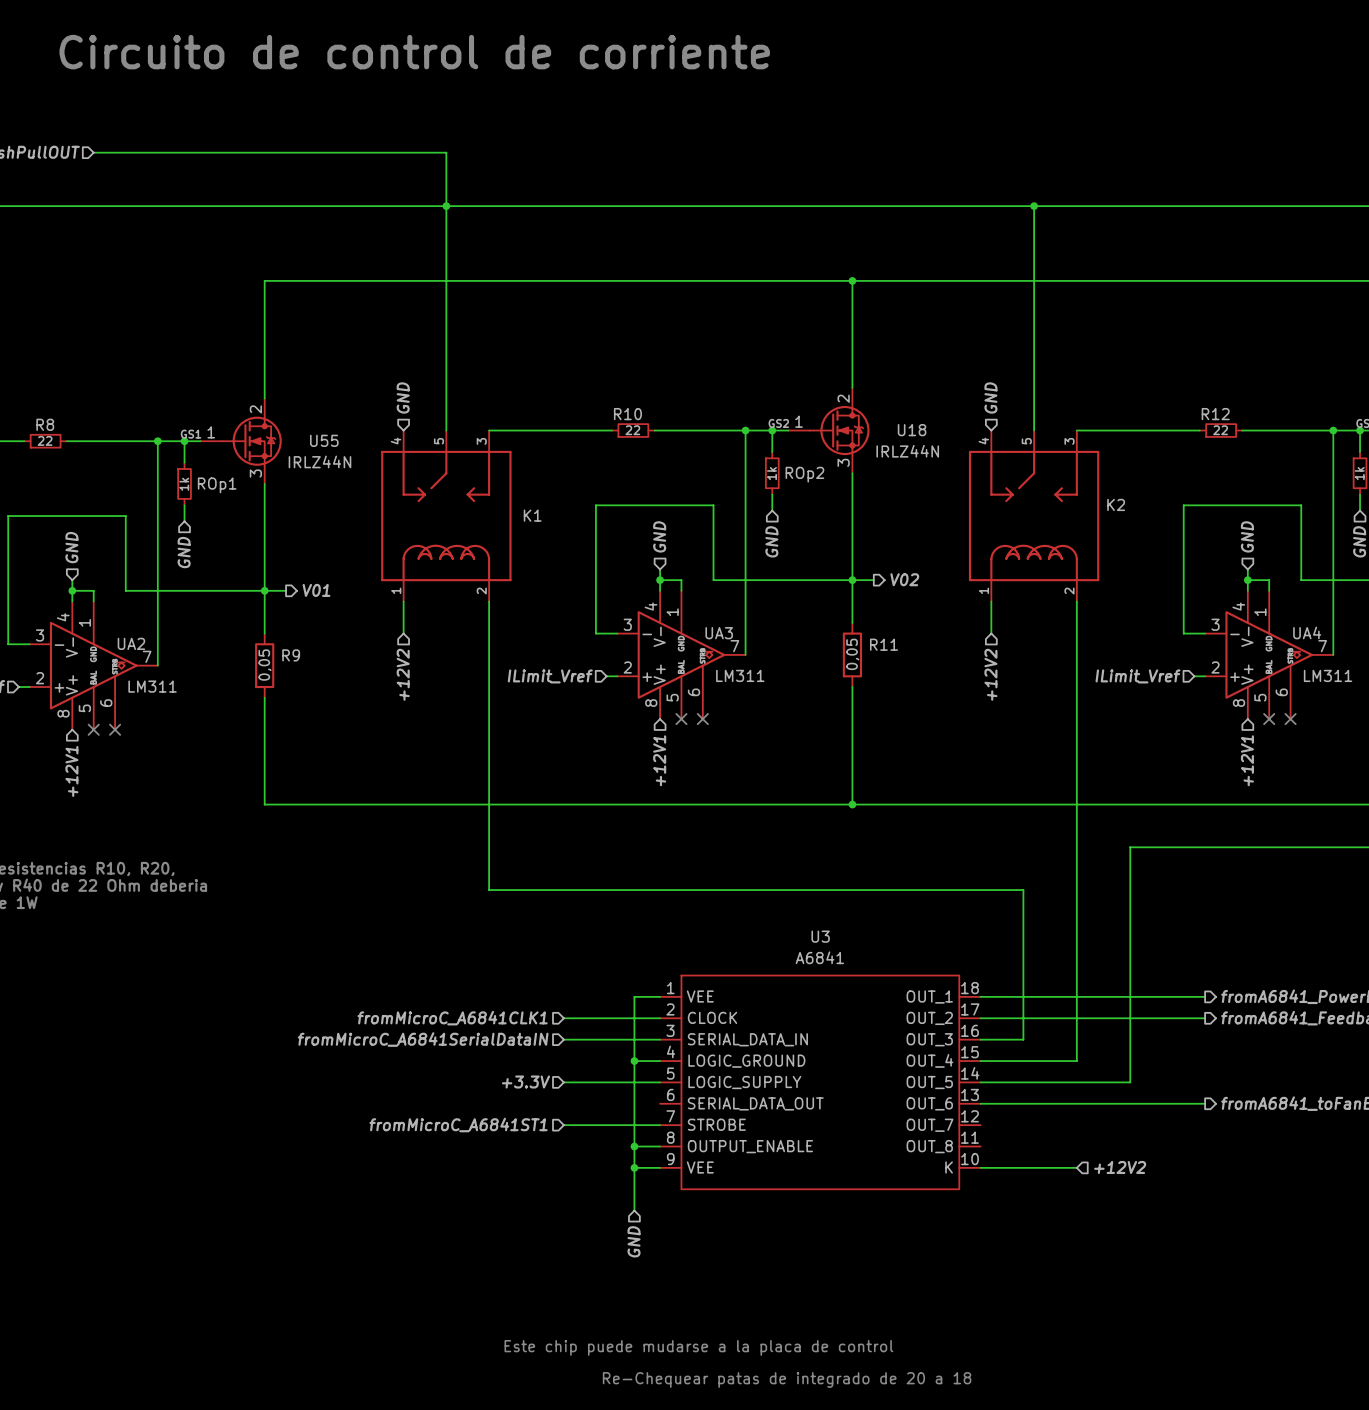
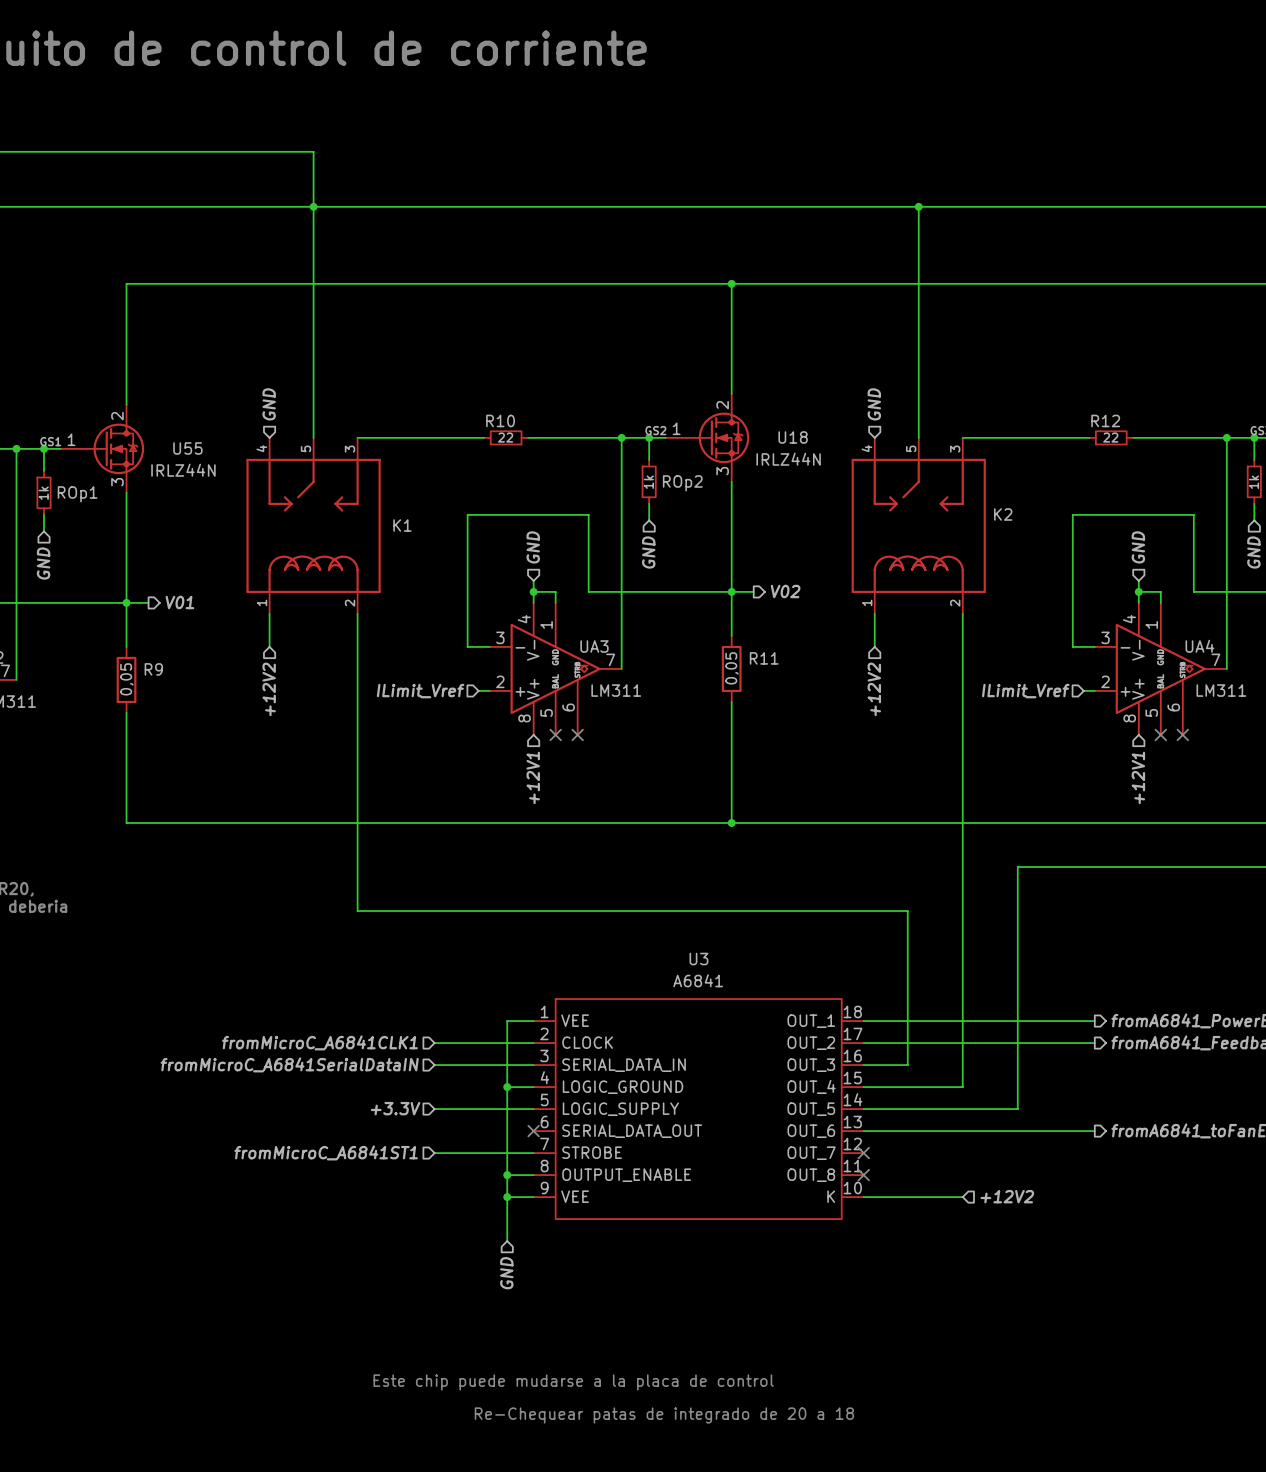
no-connect mark: none -> (533, 1131)
no-connect mark: none -> (863, 1153)
no-connect mark: none -> (863, 1175)

